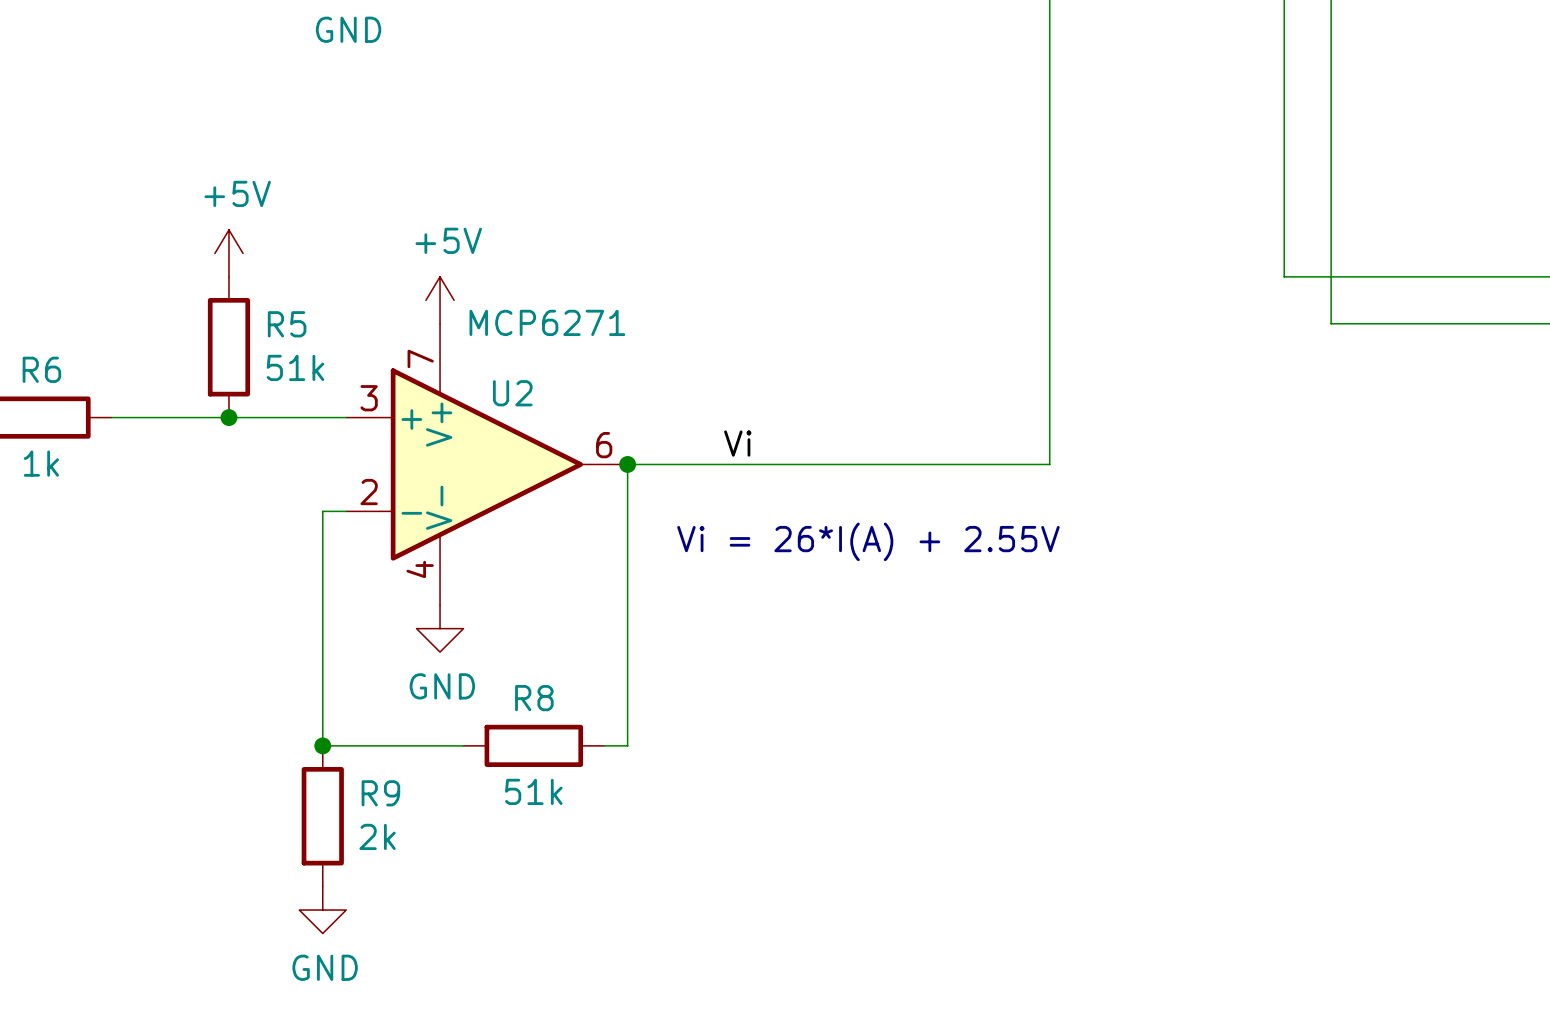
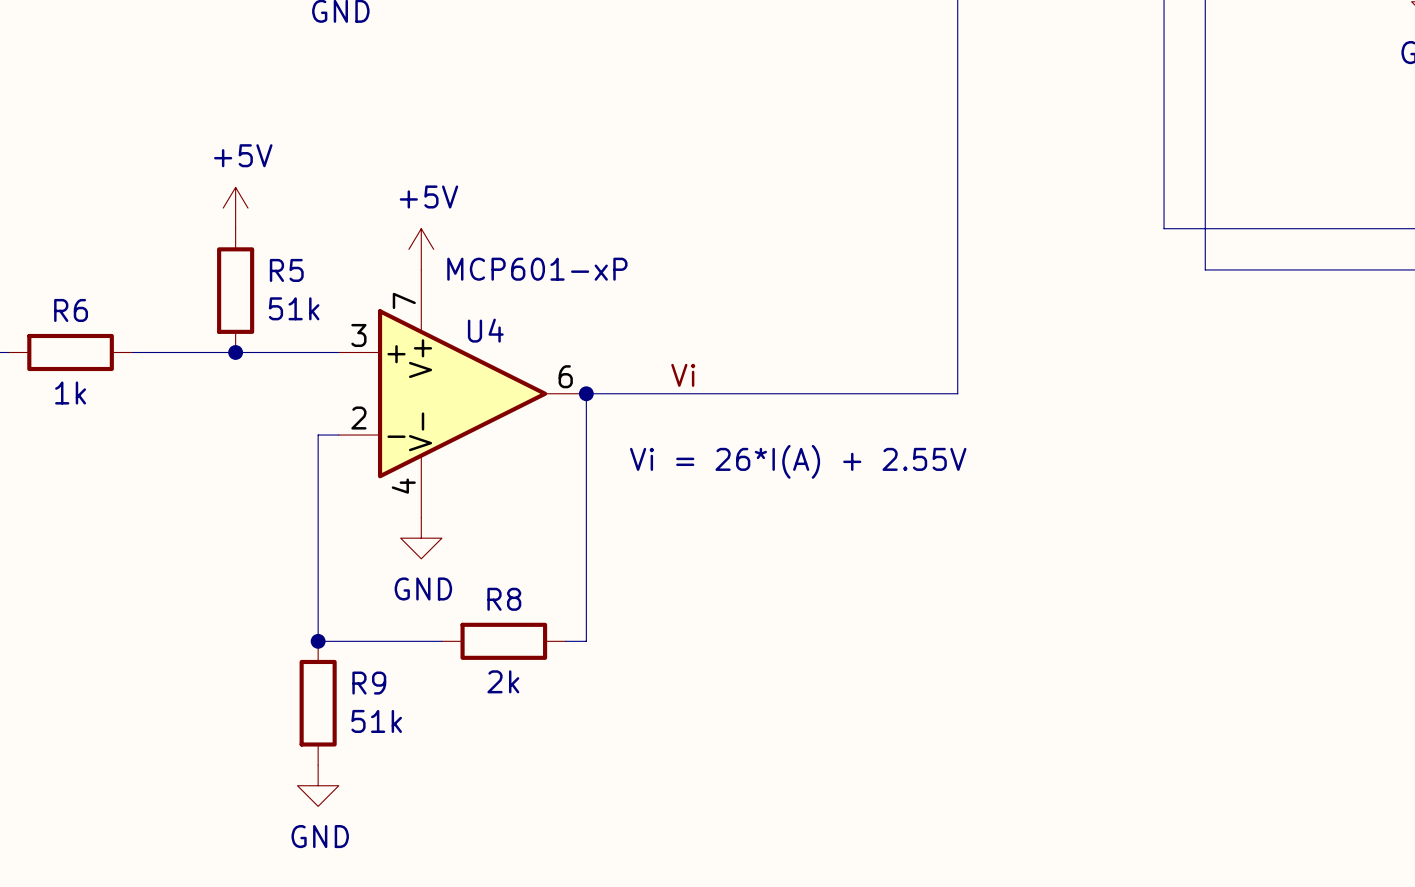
U2 value: MCP6271 (547, 322) -> MCP601-xP (537, 269)
U2 name: U2 (512, 393) -> U4 (485, 330)
R8 value: 51k (533, 791) -> 2k (503, 681)
R9 value: 2k (377, 836) -> 51k (376, 721)

